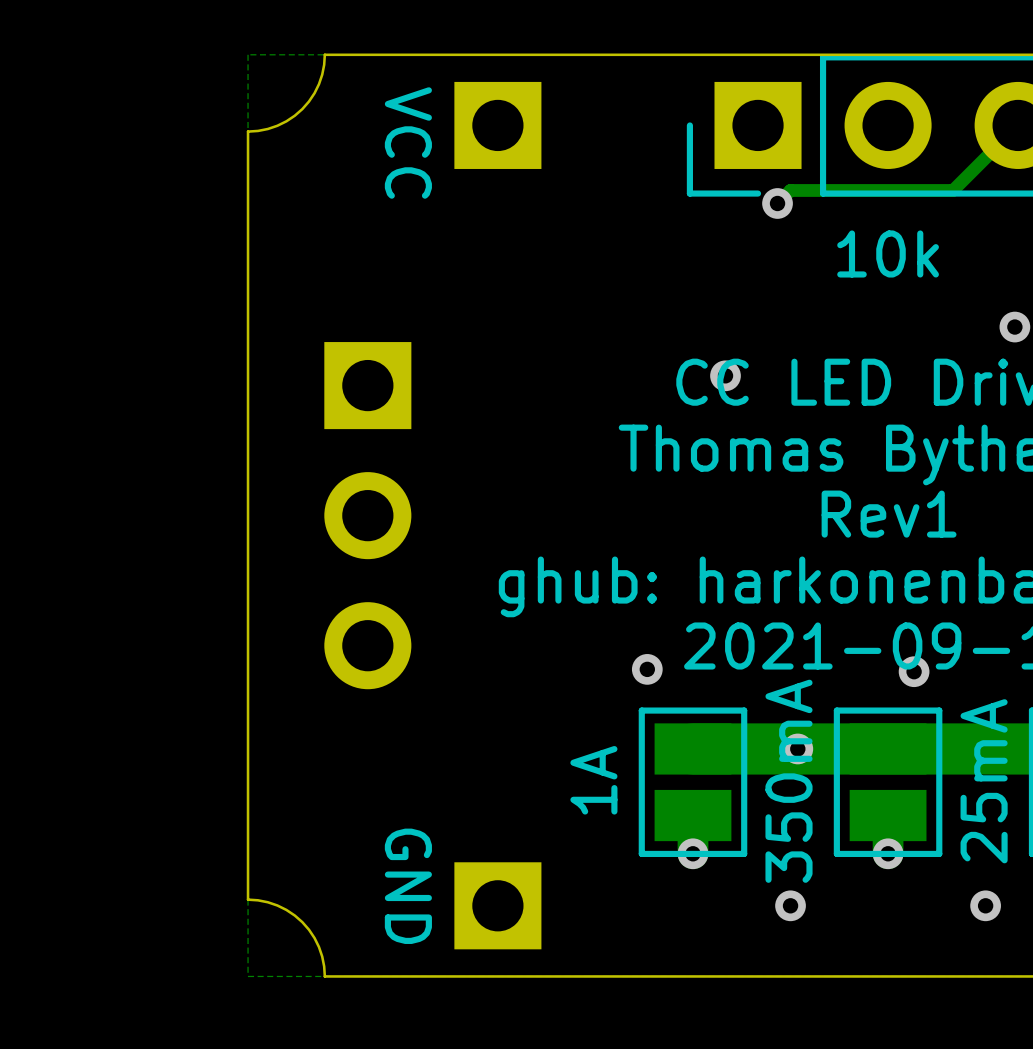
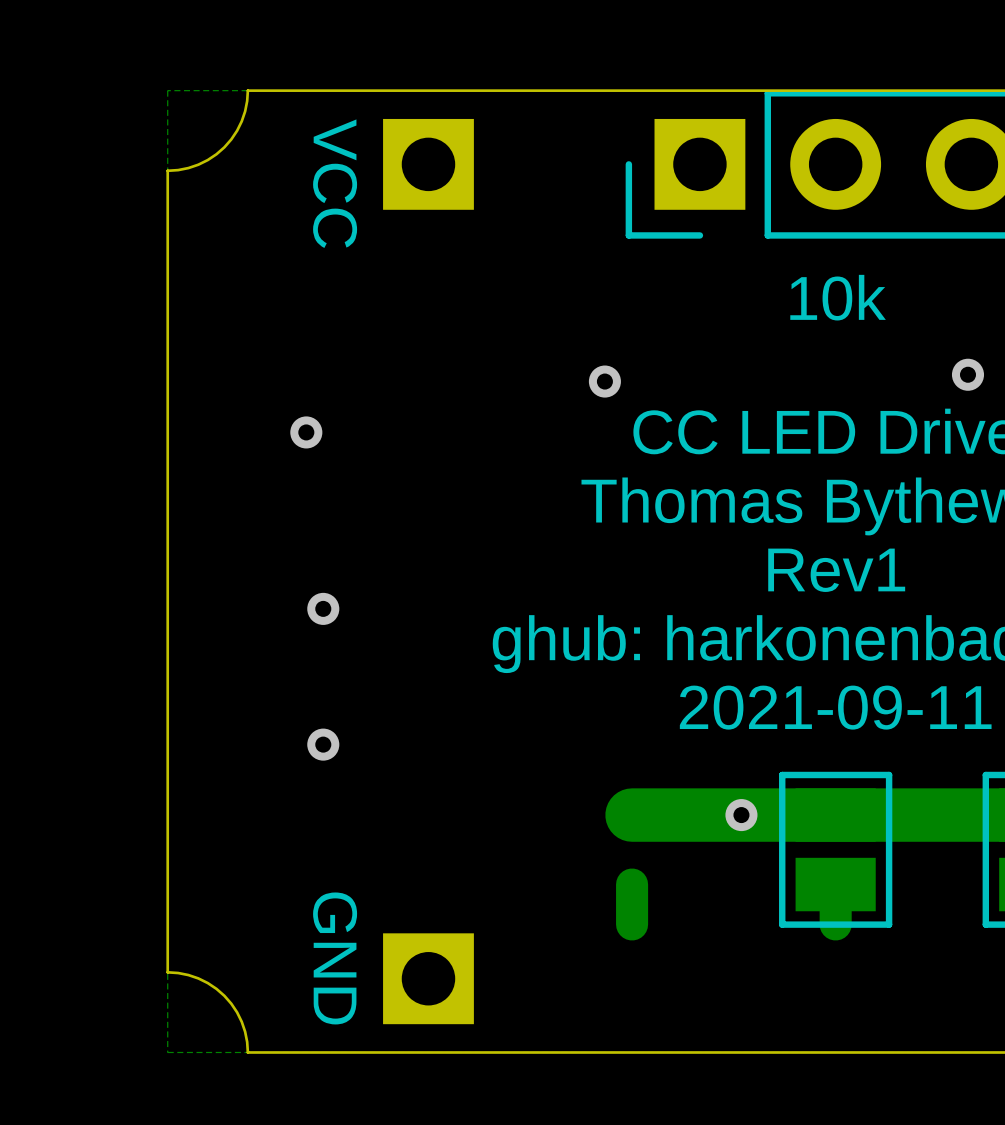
track: (1018, 125) (953, 190) (790, 190) (777, 203) -> none
via: (777, 203) -> none
via position: (725, 375) -> (604, 381)
via: none -> (306, 432)
part: (367, 515) -> none
via: none -> (323, 608)
via: (647, 669) -> none
via: (914, 671) -> none
via: none -> (323, 744)
text: 1A (593, 780) -> none
text: 350mA (789, 781) -> none
text: 25mA (984, 781) -> none
part: (692, 782) -> none
via: (692, 853) -> none
via: (888, 853) -> none
via: (790, 905) -> none
via: (985, 905) -> none

